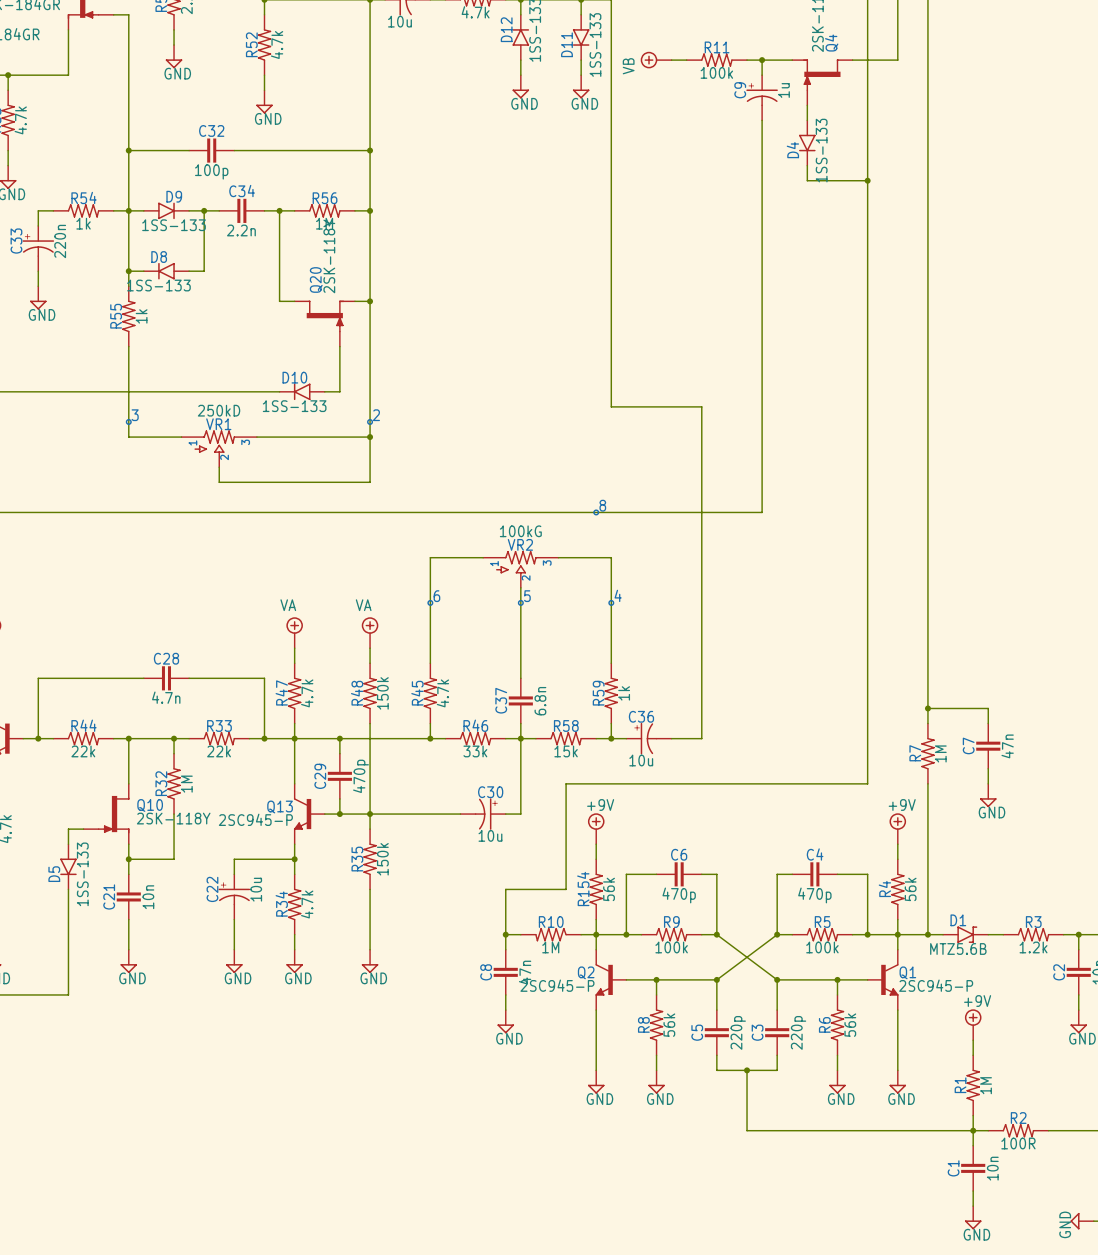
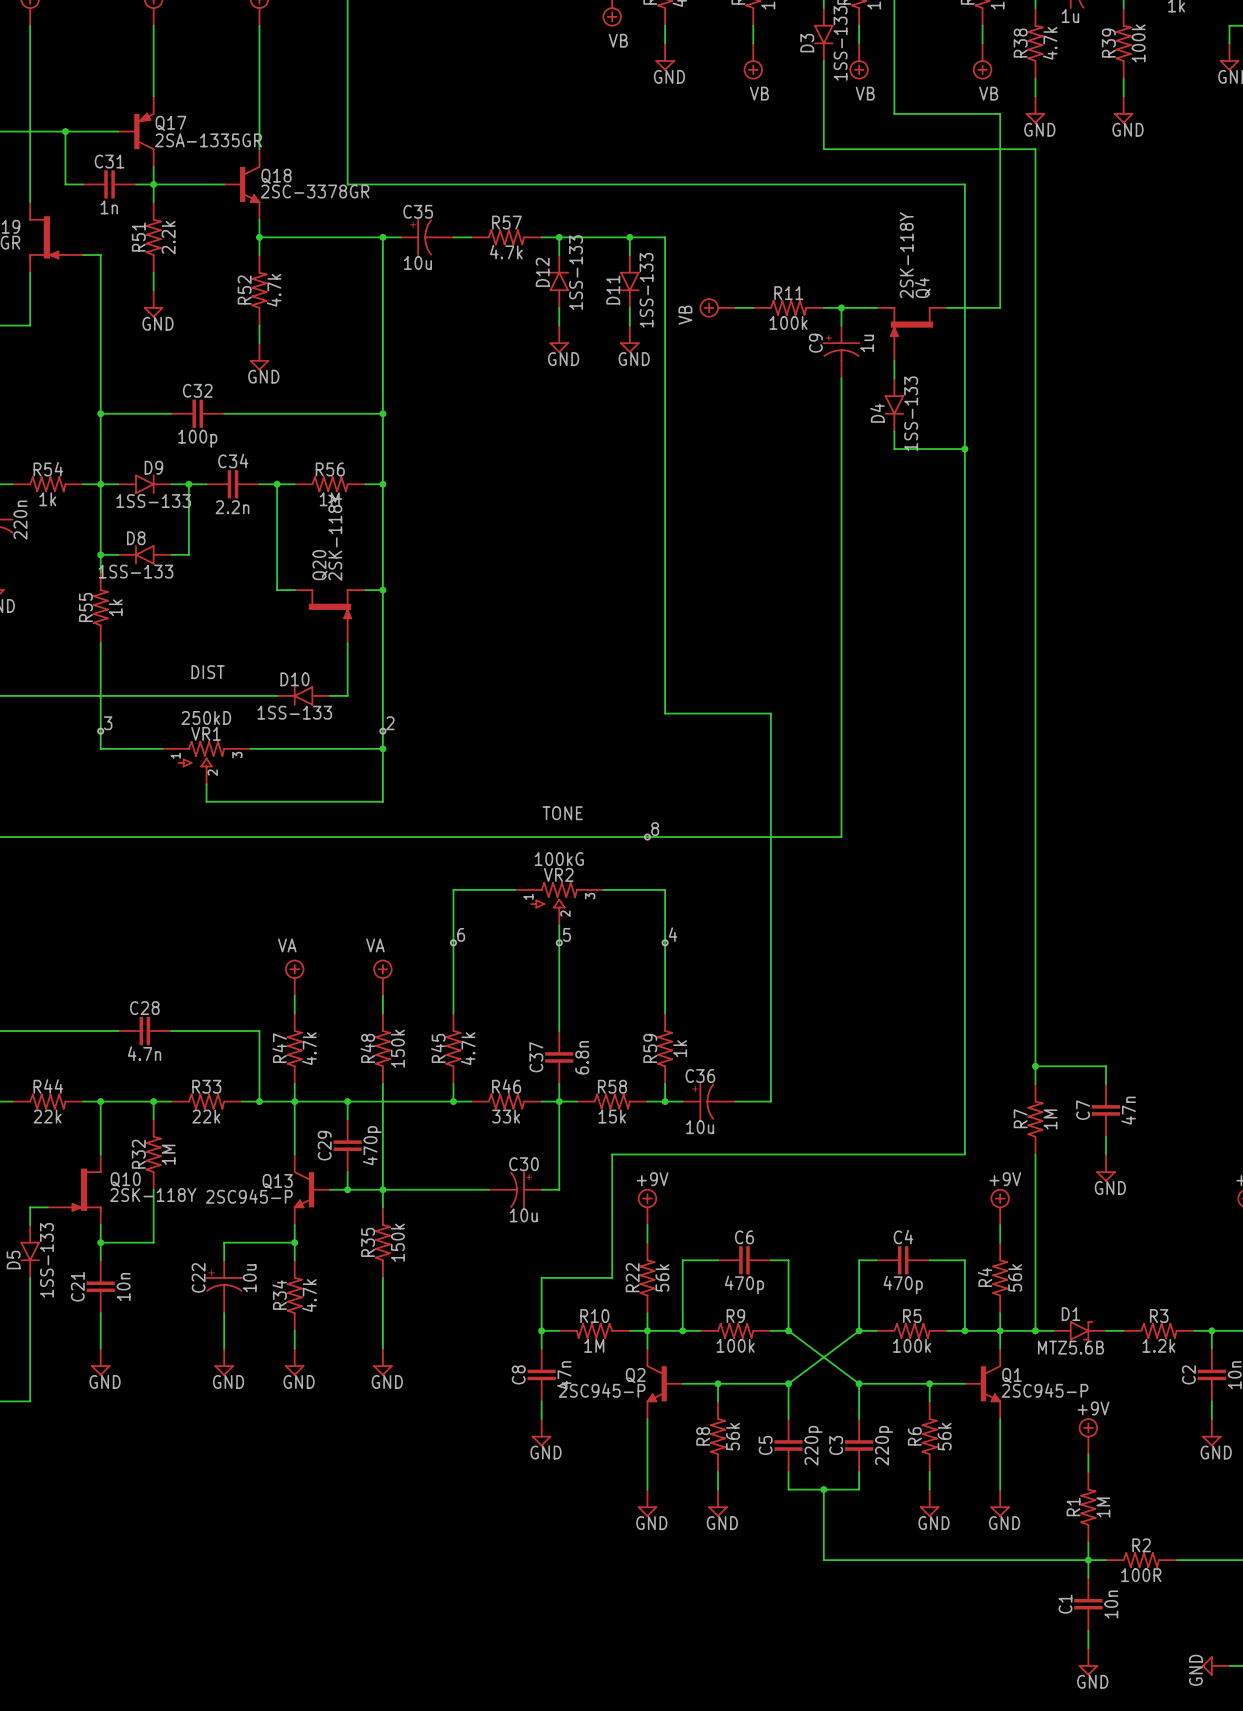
text: none -> DIST (208, 672)
text: none -> TONE (562, 813)
R154 name: R154 (583, 888) -> R22 (632, 1277)

